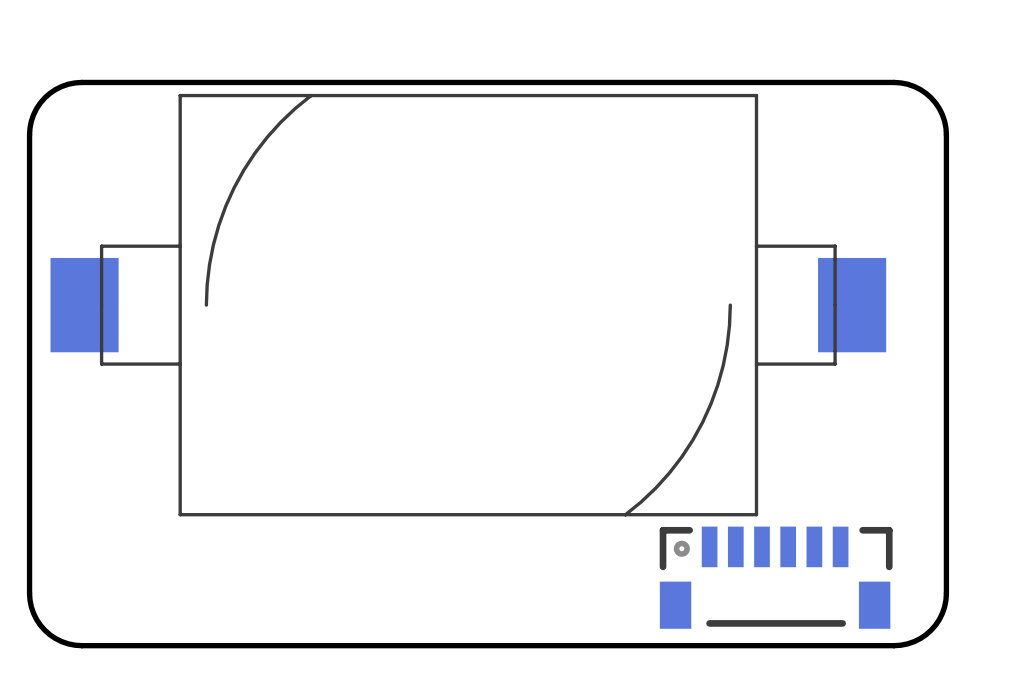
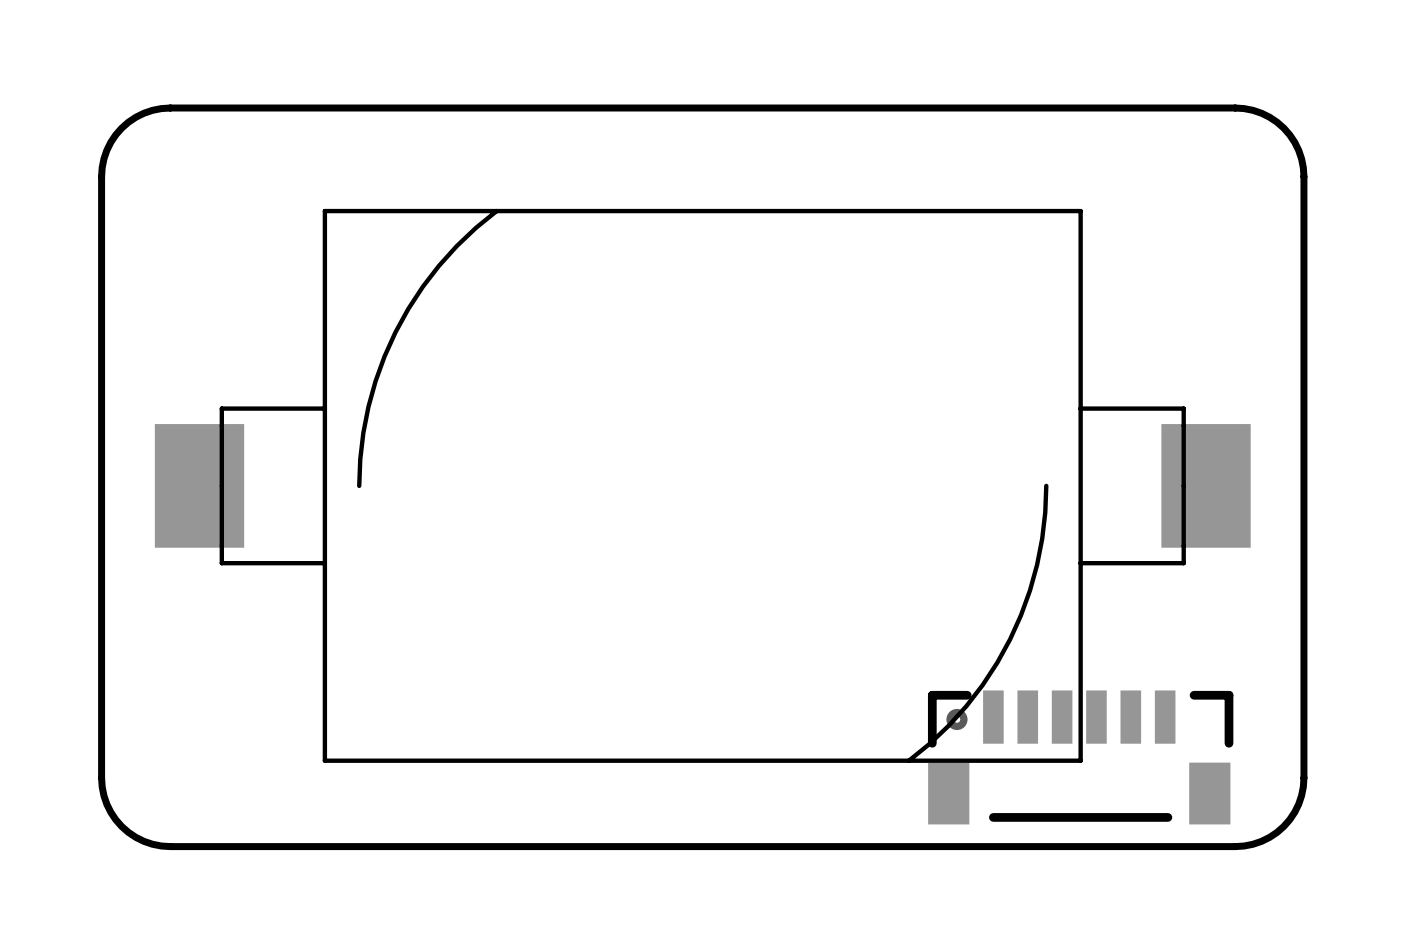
part position: (468, 305) -> (702, 485)

